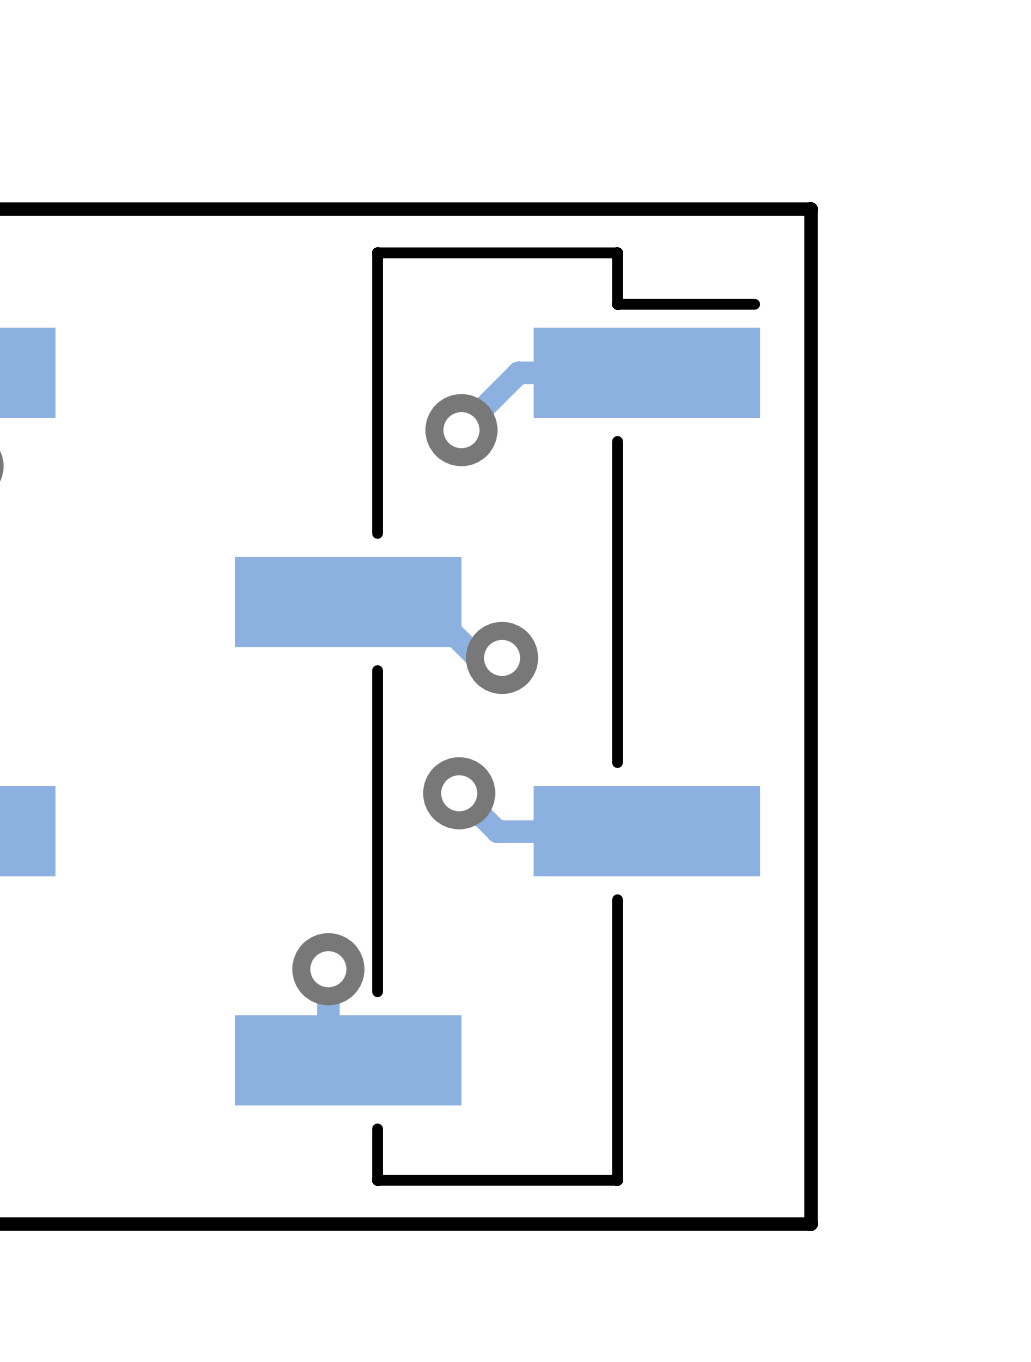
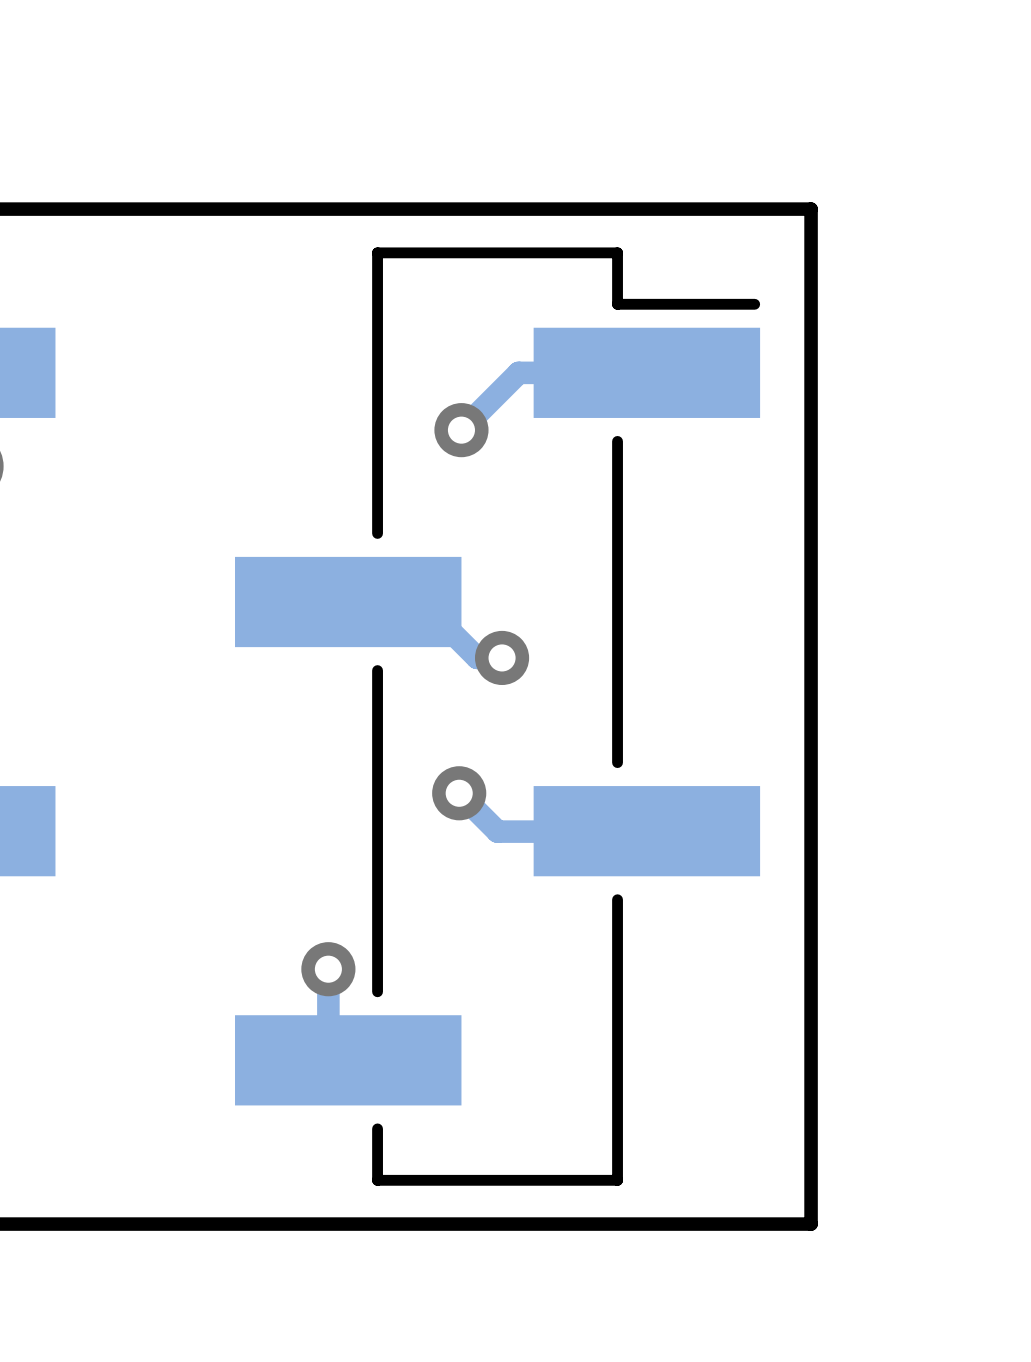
via size: [425, 394, 498, 467] -> [434, 403, 489, 458]
via size: [465, 621, 539, 695] -> [474, 630, 530, 686]
via size: [423, 757, 496, 830] -> [432, 766, 487, 821]
via size: [292, 933, 365, 1006] -> [301, 942, 356, 997]

